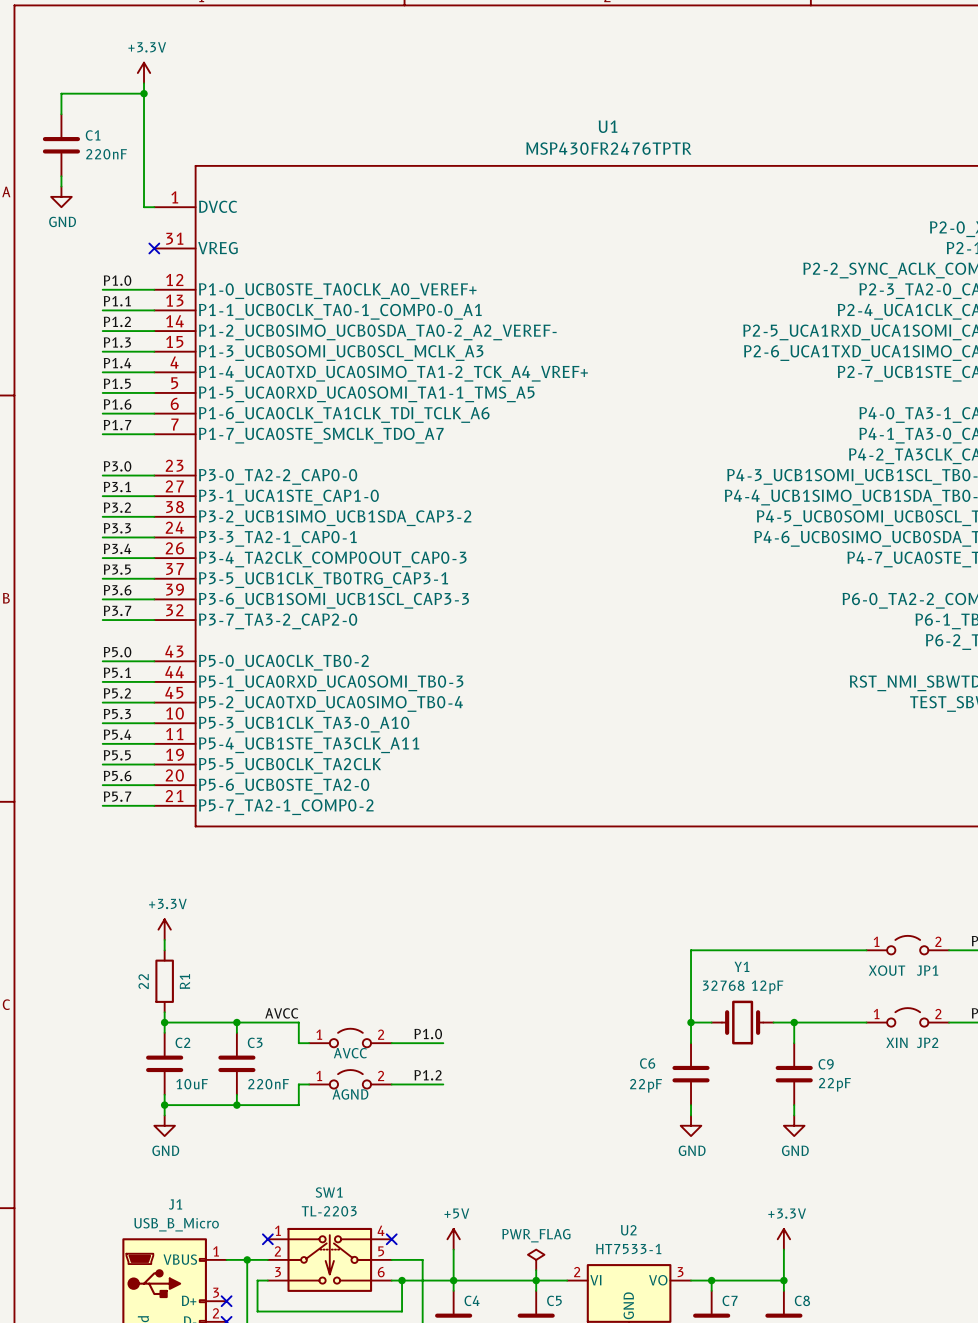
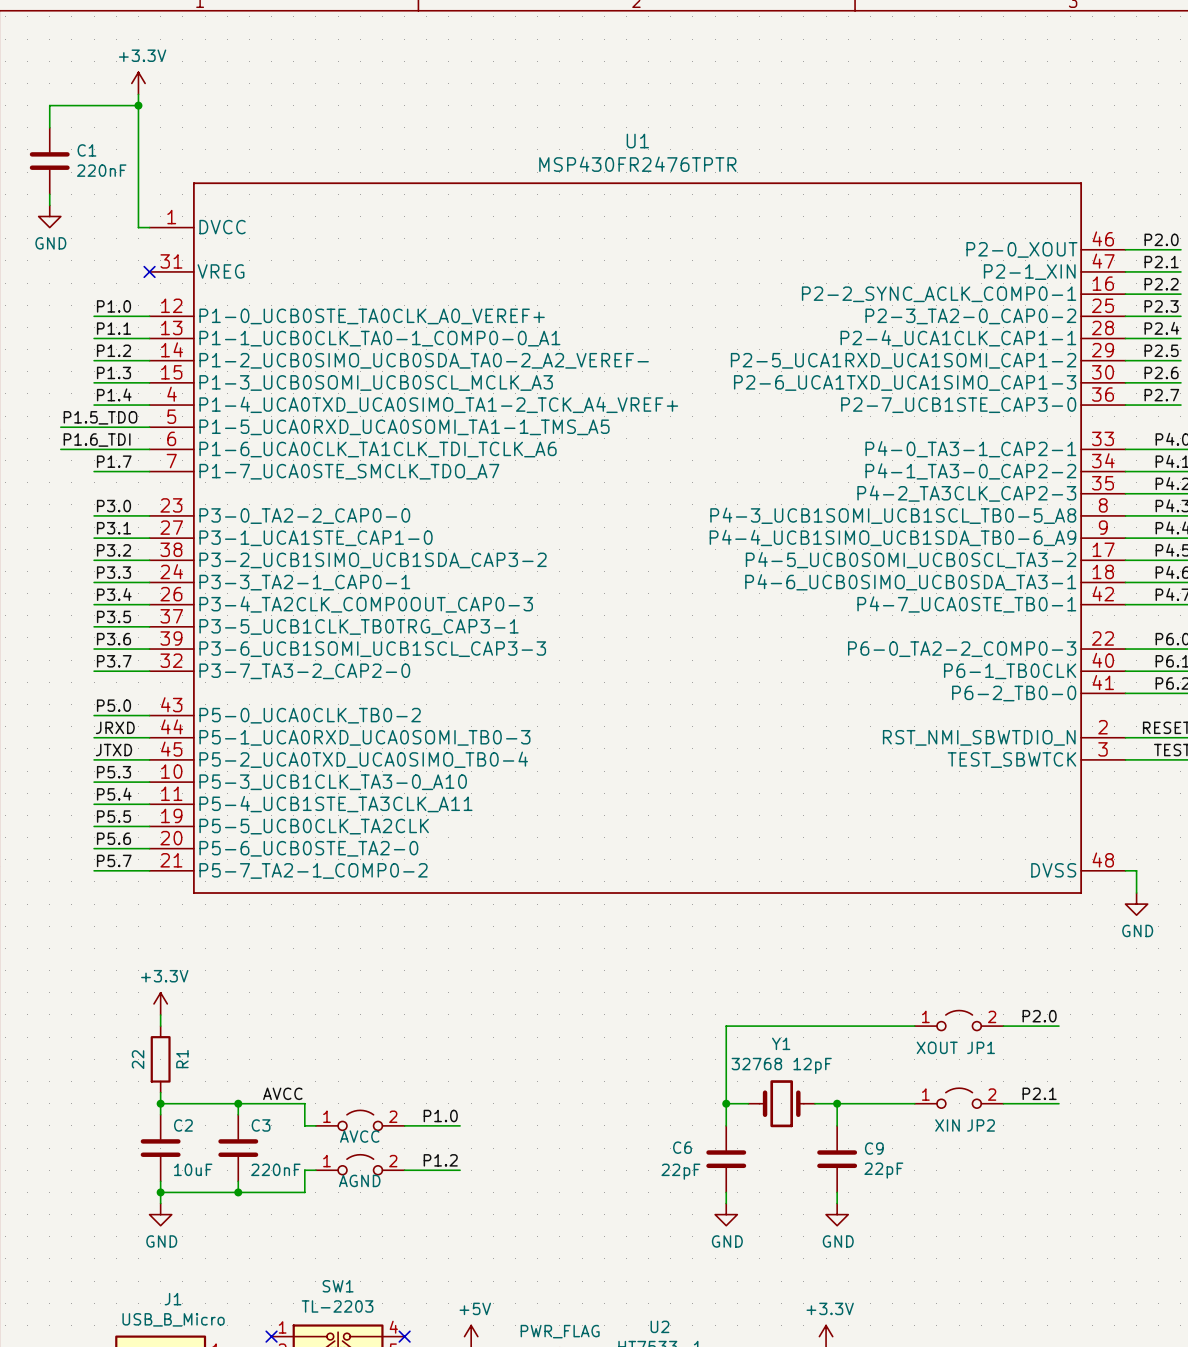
label: P1.5 (117, 383) -> P1.5_TDO (100, 417)
wire: none -> (60, 427) (94, 427)
label: P1.6 (117, 404) -> P1.6_TDI (97, 440)
wire: none -> (60, 449) (94, 449)
label: P5.1 (117, 672) -> JRXD (115, 727)
label: P5.2 (117, 693) -> JTXD (113, 750)

